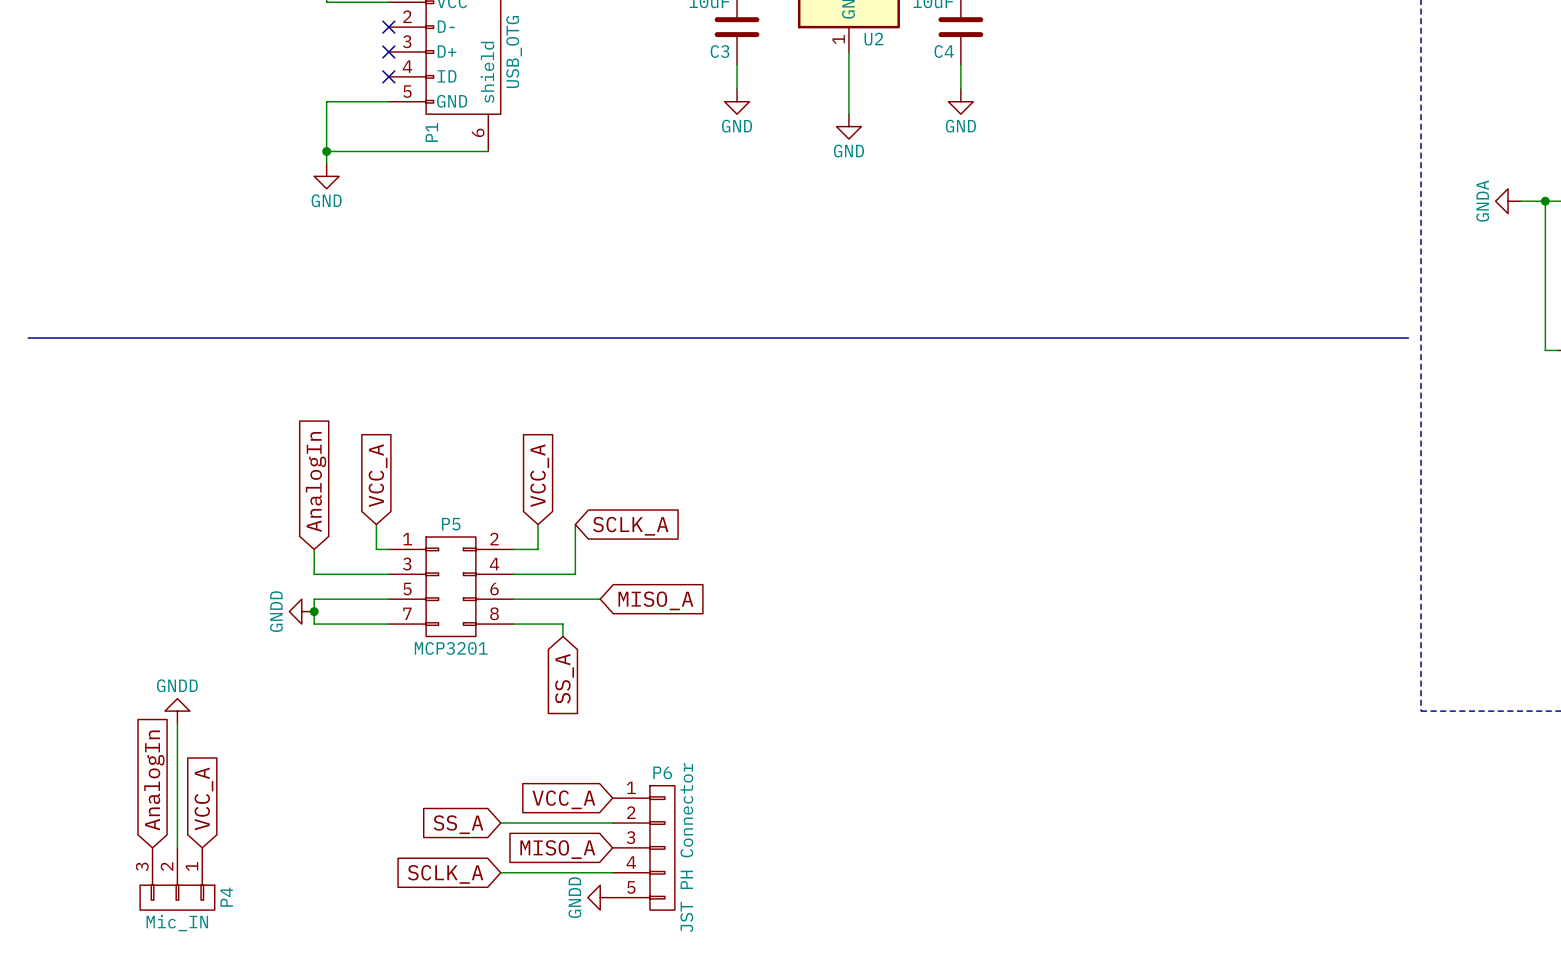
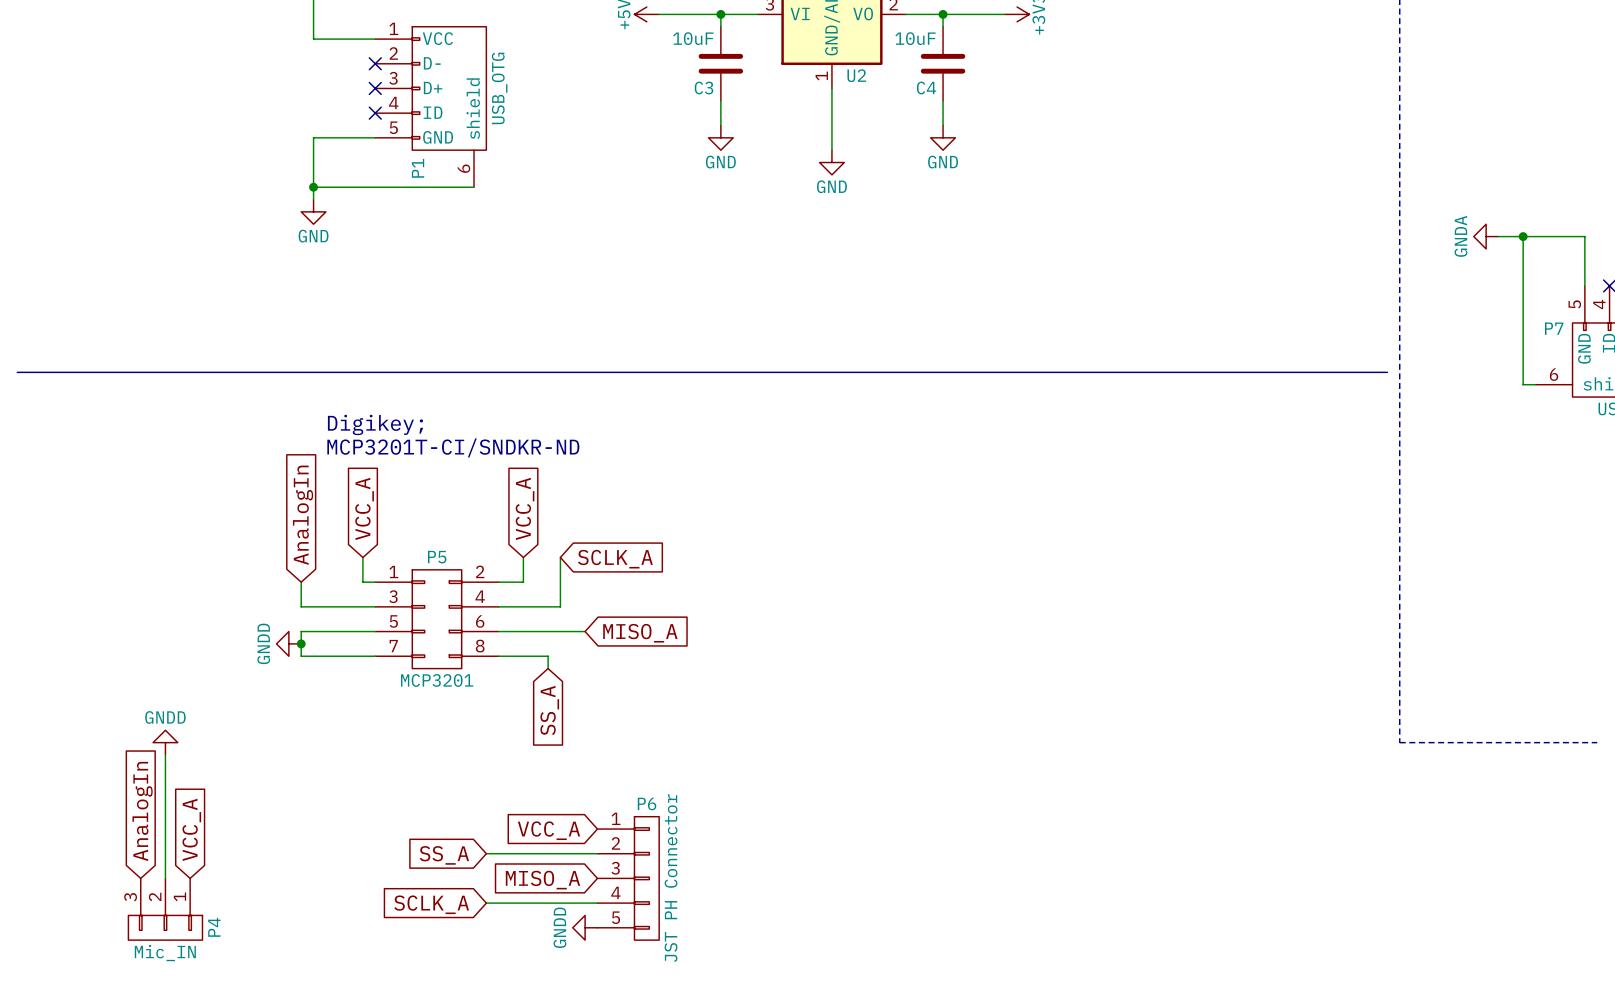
text: none -> Digikey; (375, 424)
text: none -> MCP3201T-CI/SNDKR-ND (453, 447)

